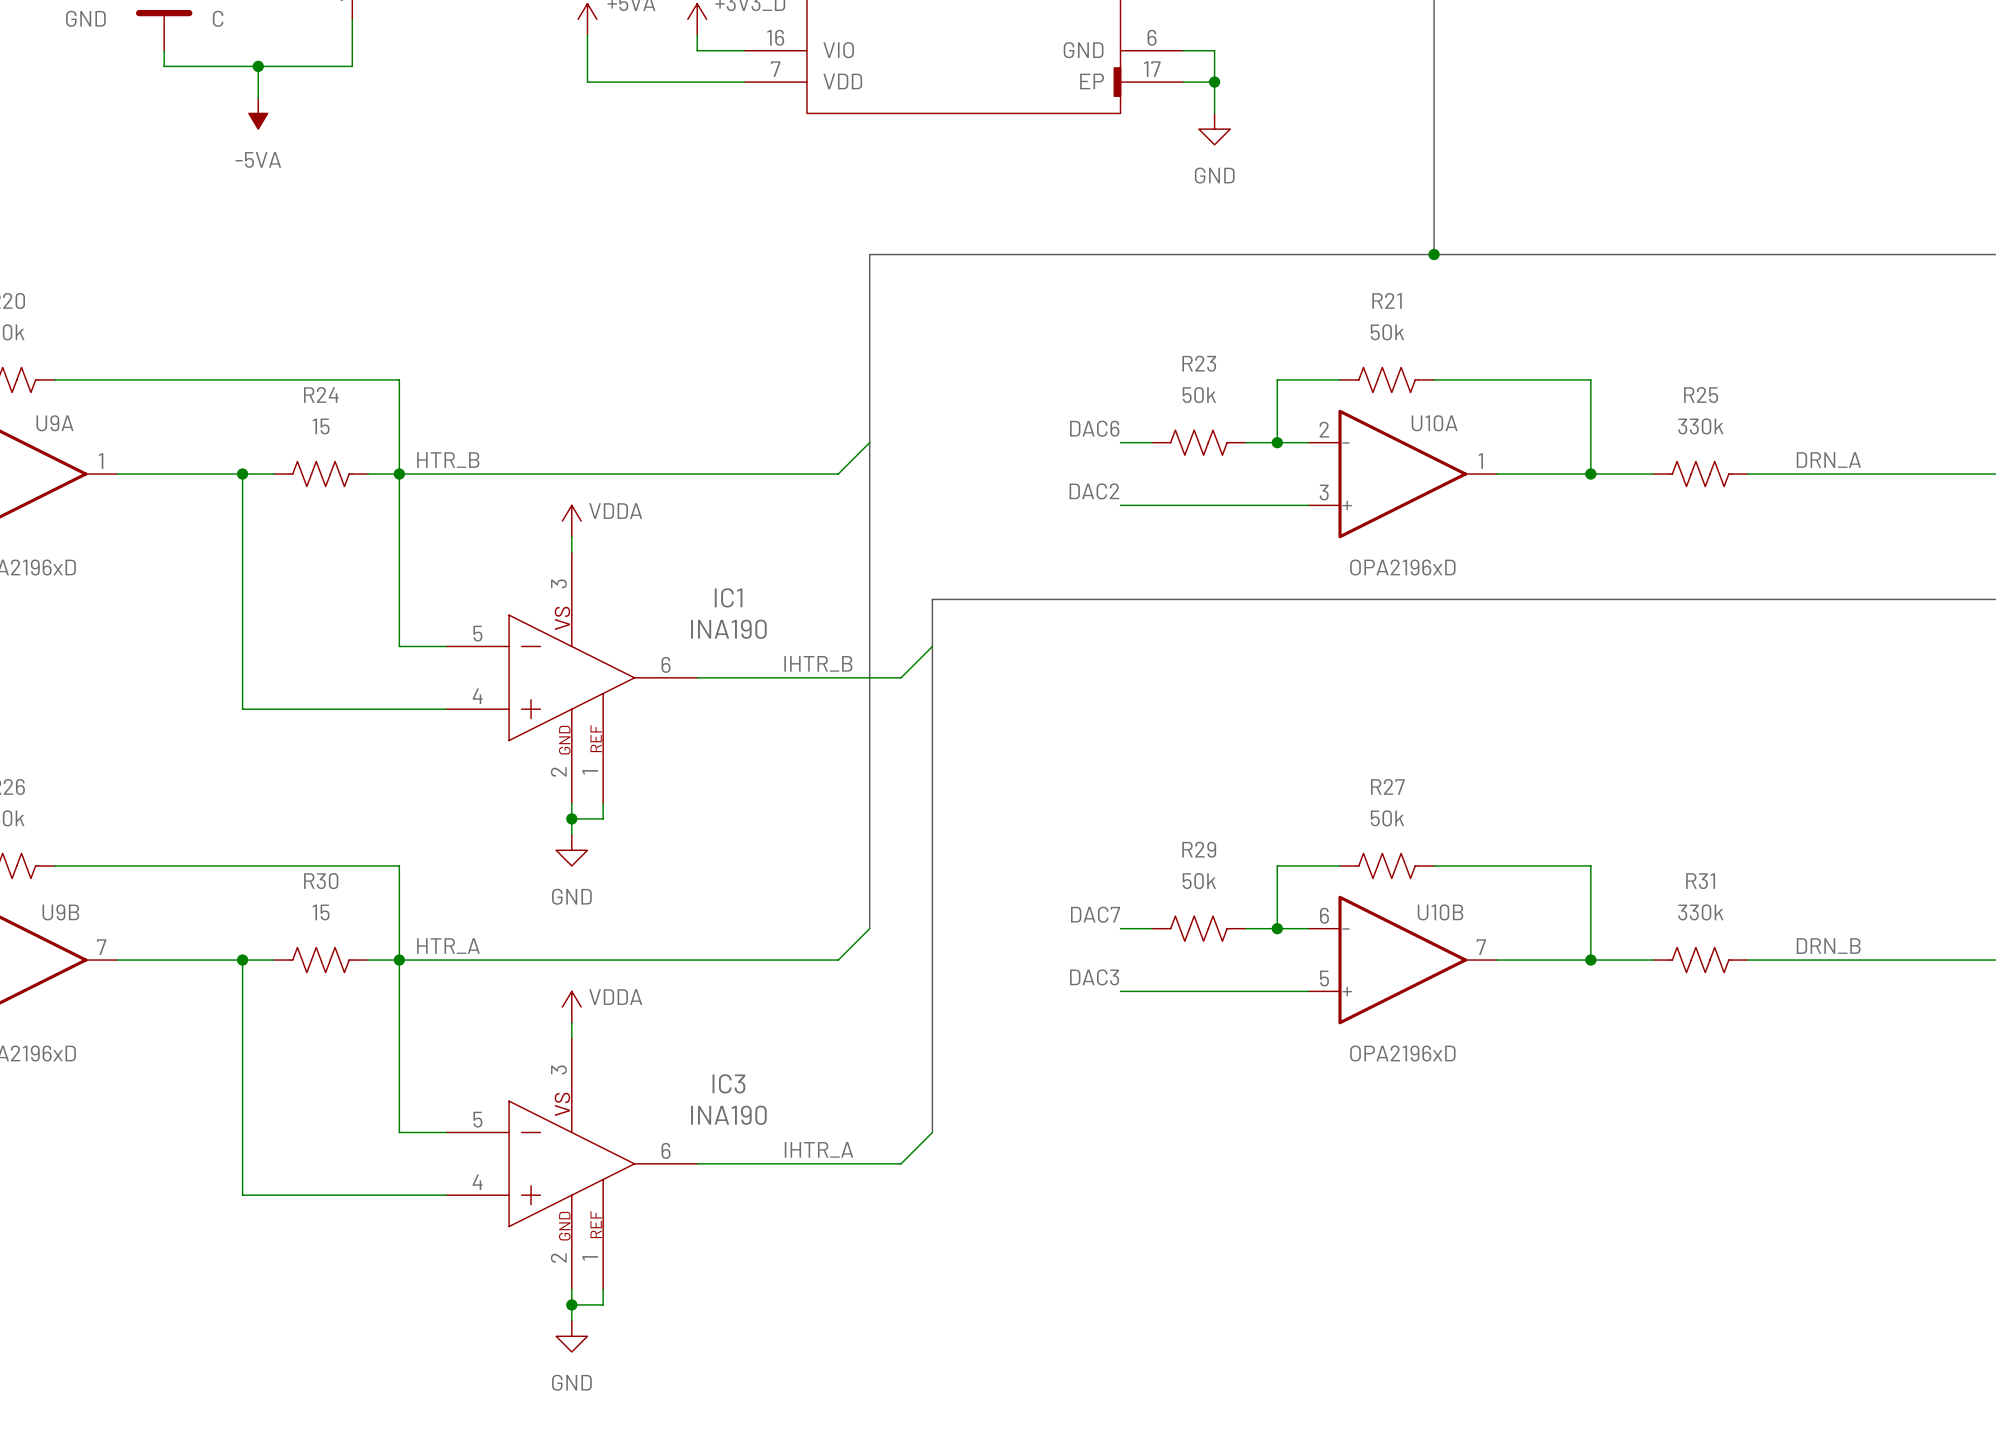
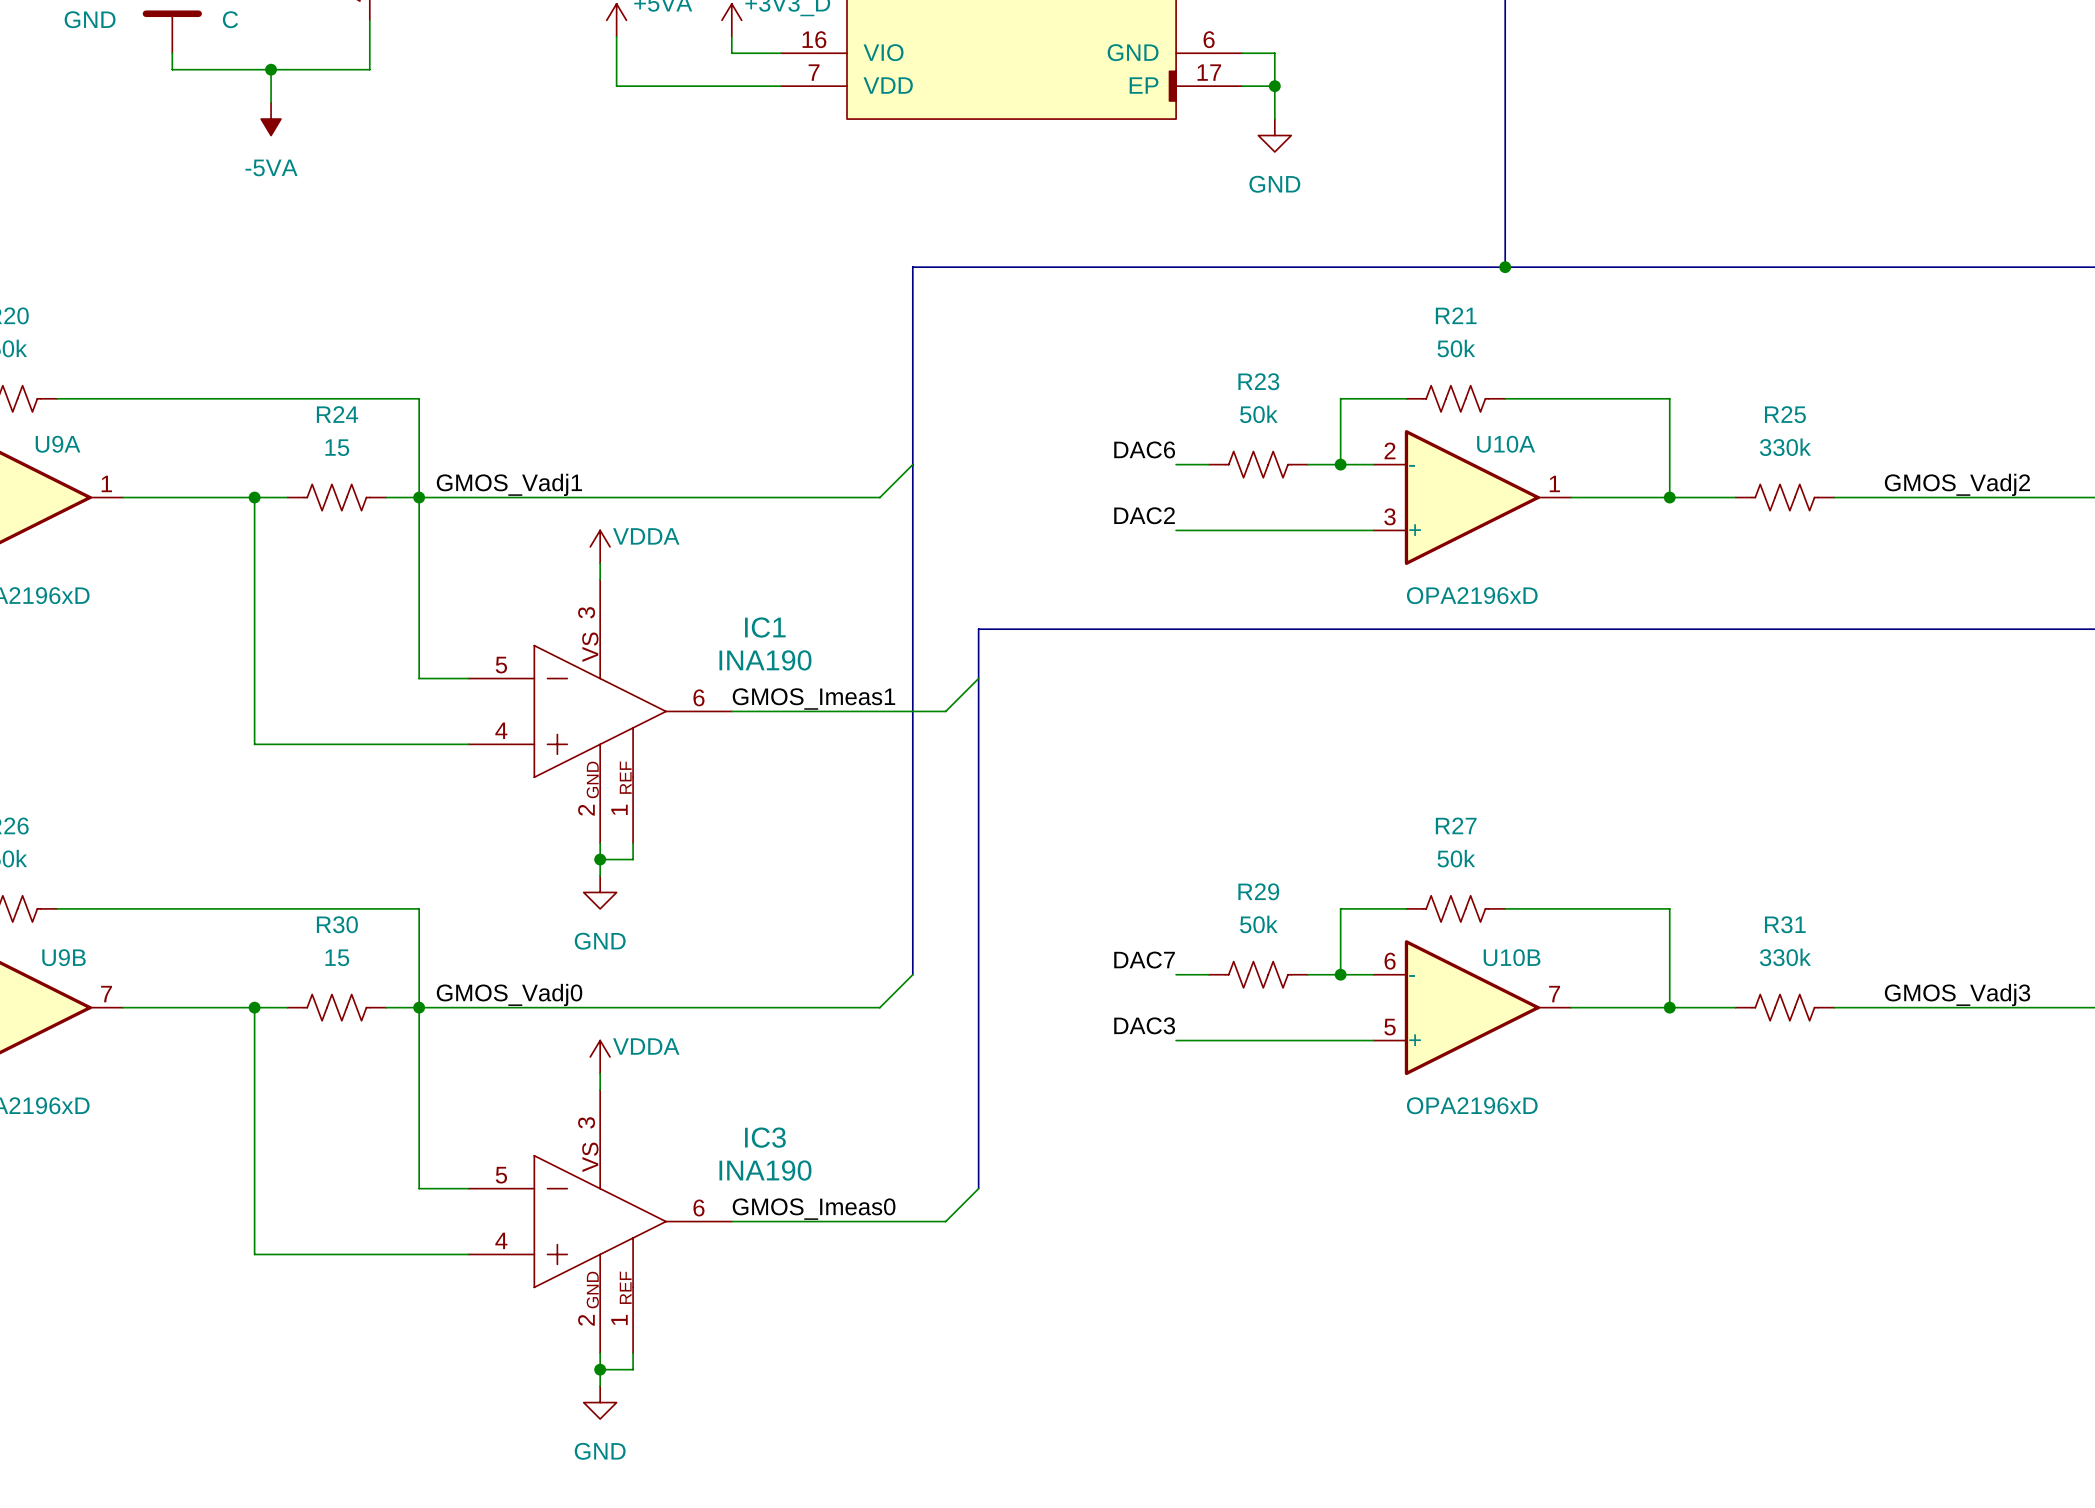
label: HTR_B (448, 460) -> GMOS_Vadj1 (509, 484)
label: DRN_A (1828, 460) -> GMOS_Vadj2 (1957, 484)
label: IHTR_B (818, 663) -> GMOS_Imeas1 (813, 699)
label: HTR_A (448, 946) -> GMOS_Vadj0 (509, 995)
label: DRN_B (1828, 946) -> GMOS_Vadj3 (1957, 995)
label: IHTR_A (819, 1149) -> GMOS_Imeas0 (814, 1209)

